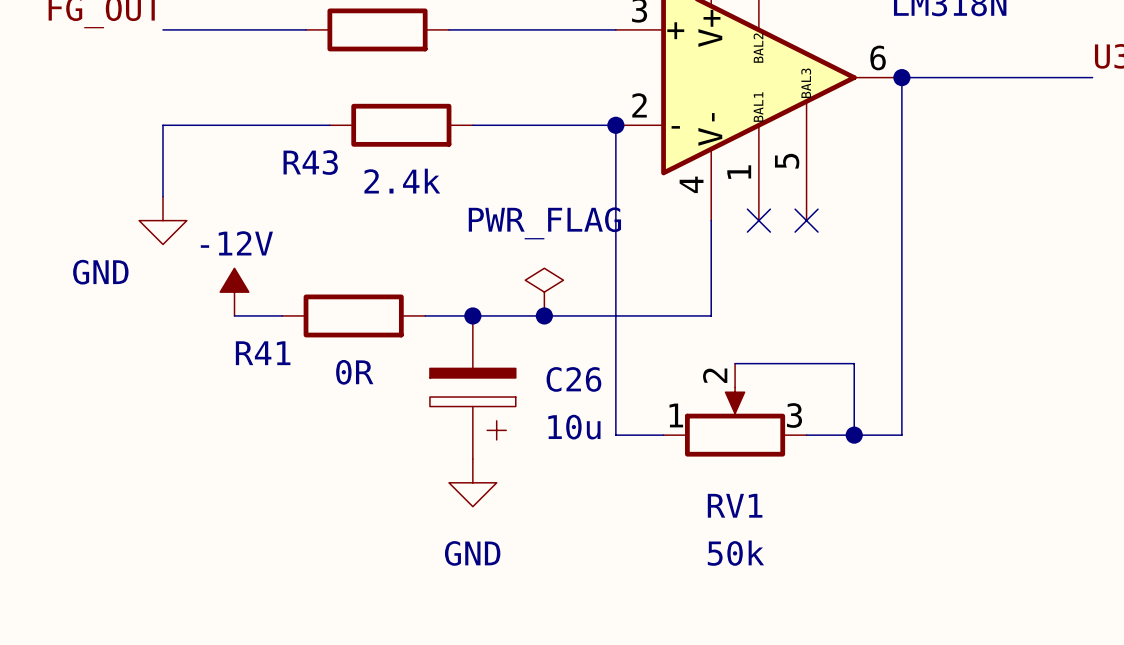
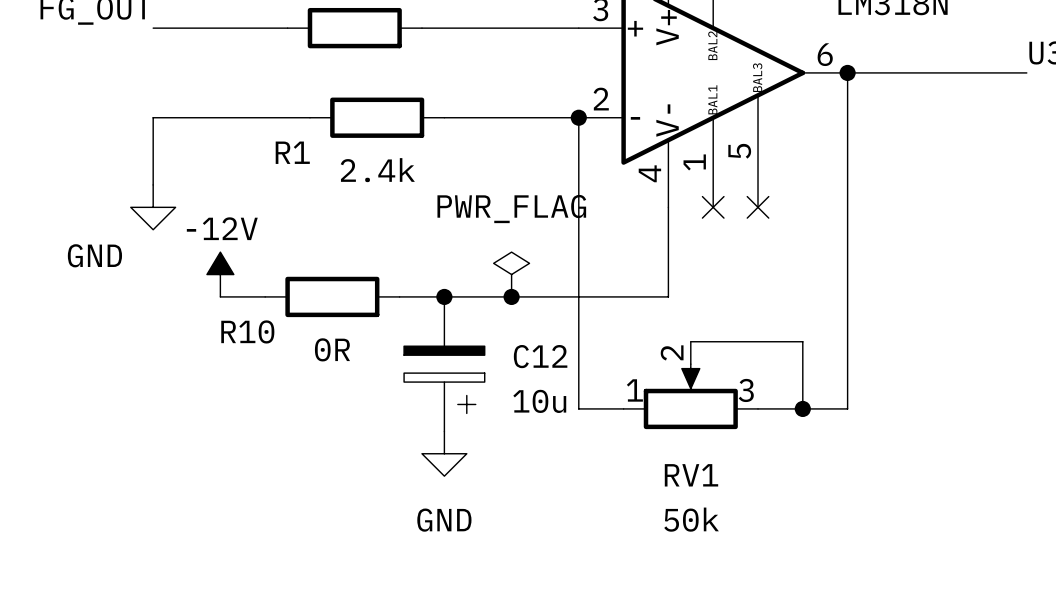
R43 name: R43 (310, 162) -> R1 (292, 152)
R41 name: R41 (263, 353) -> R10 (247, 331)
C26 name: C26 (573, 379) -> C12 (540, 356)

